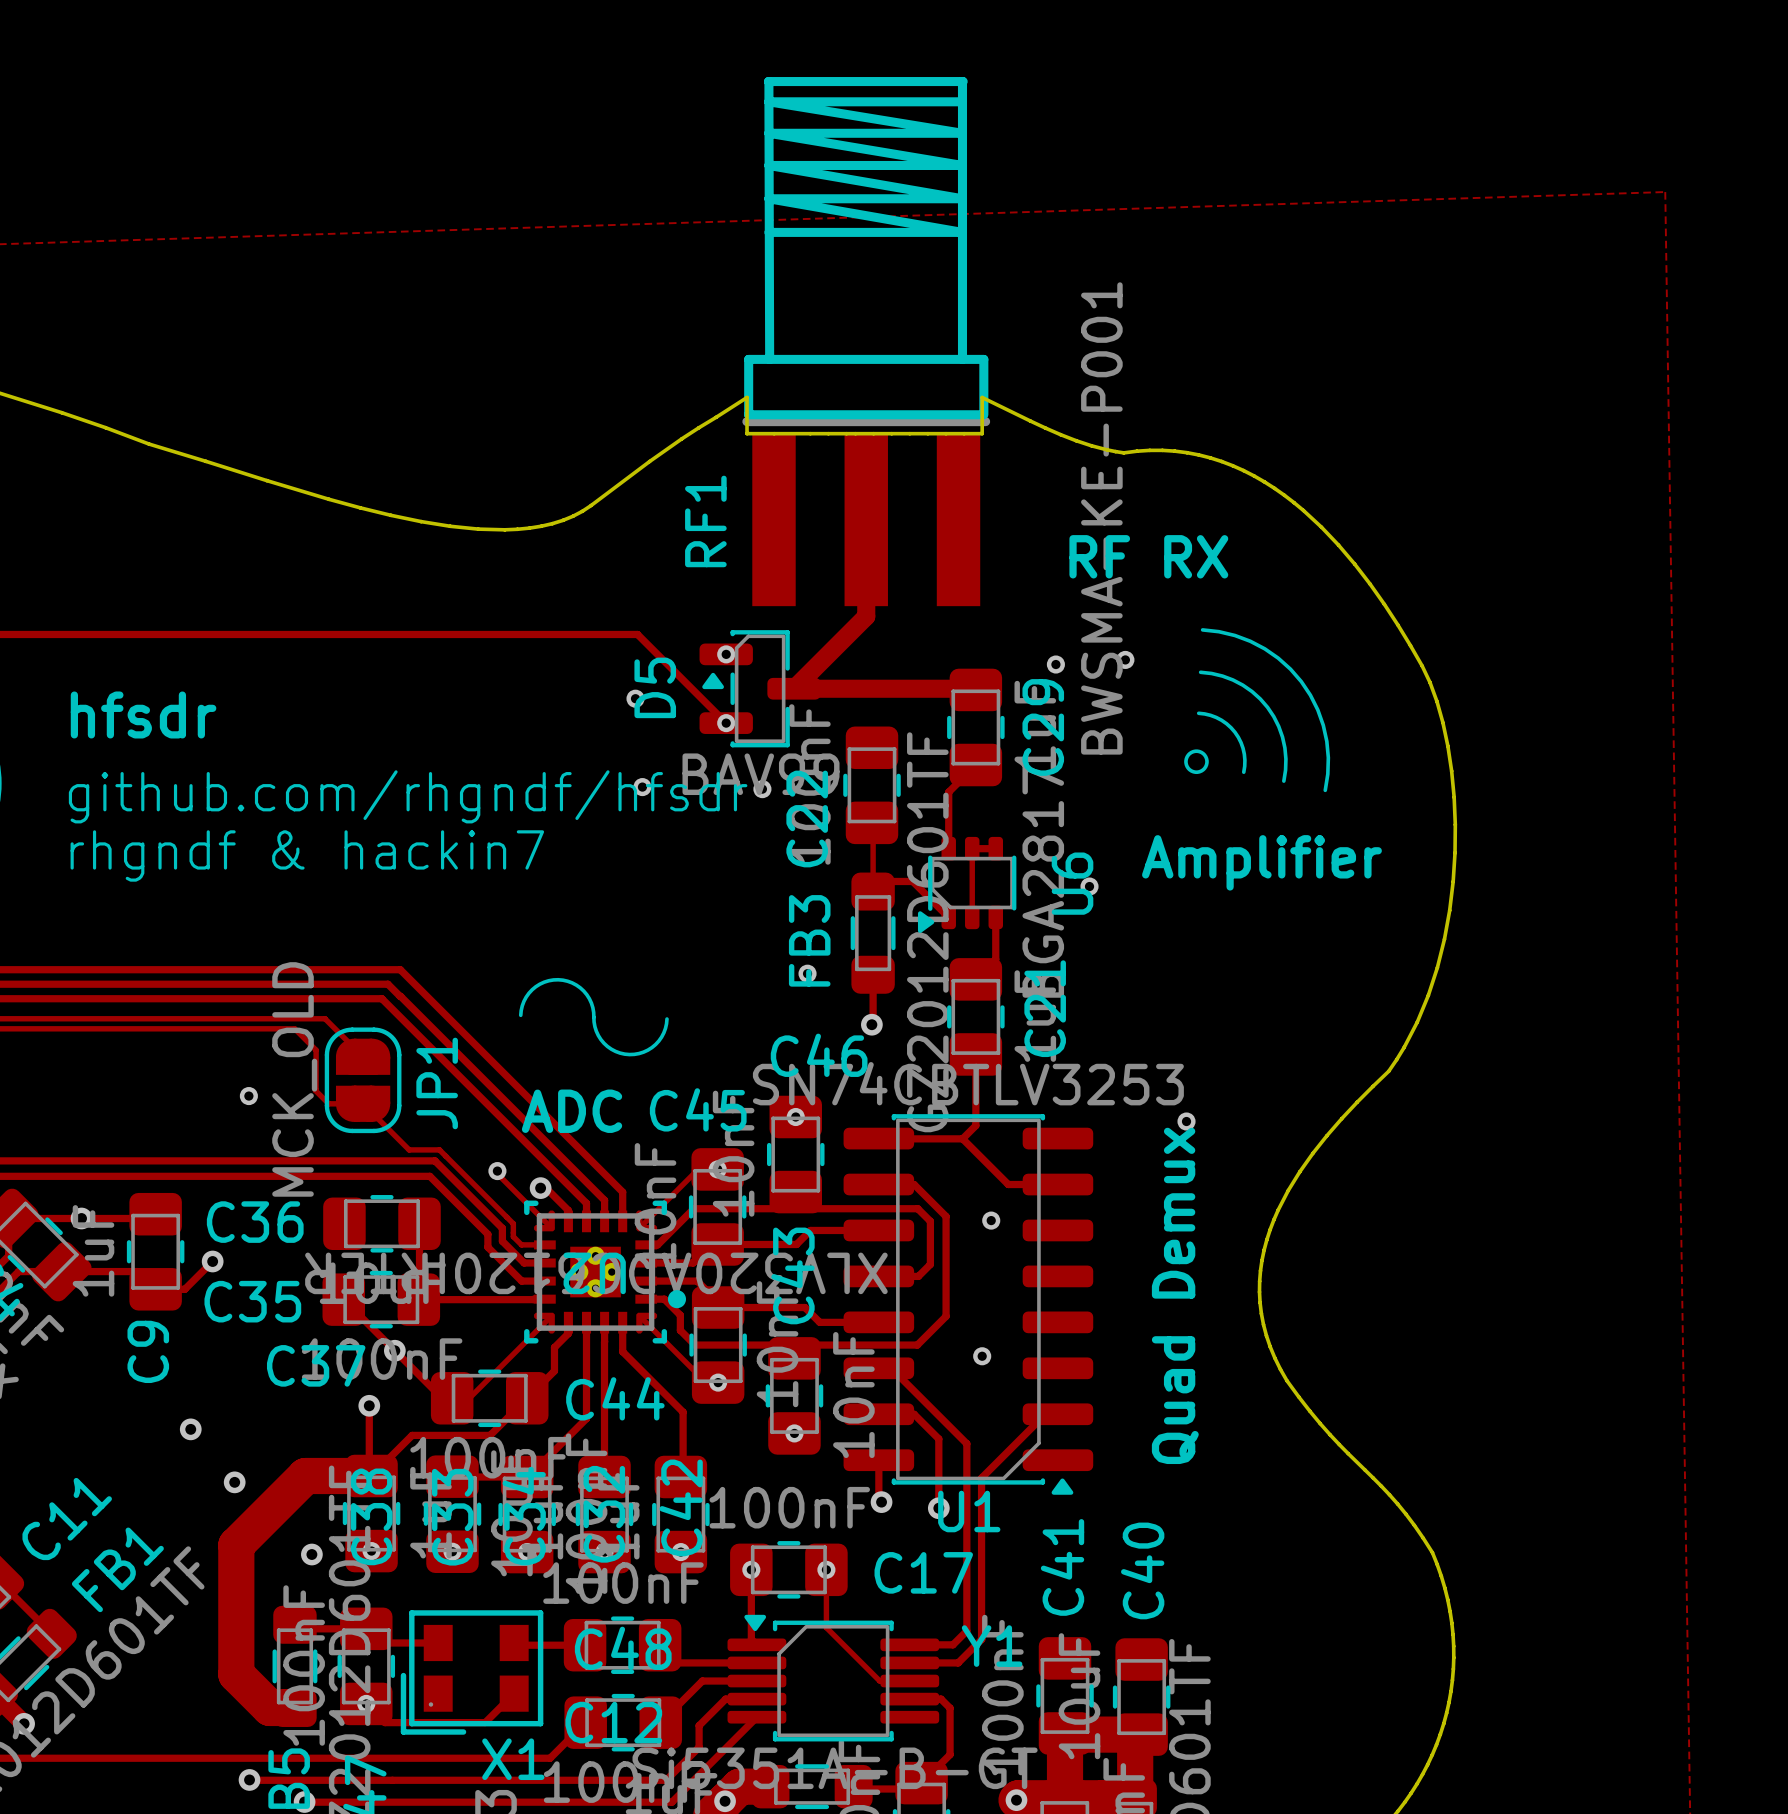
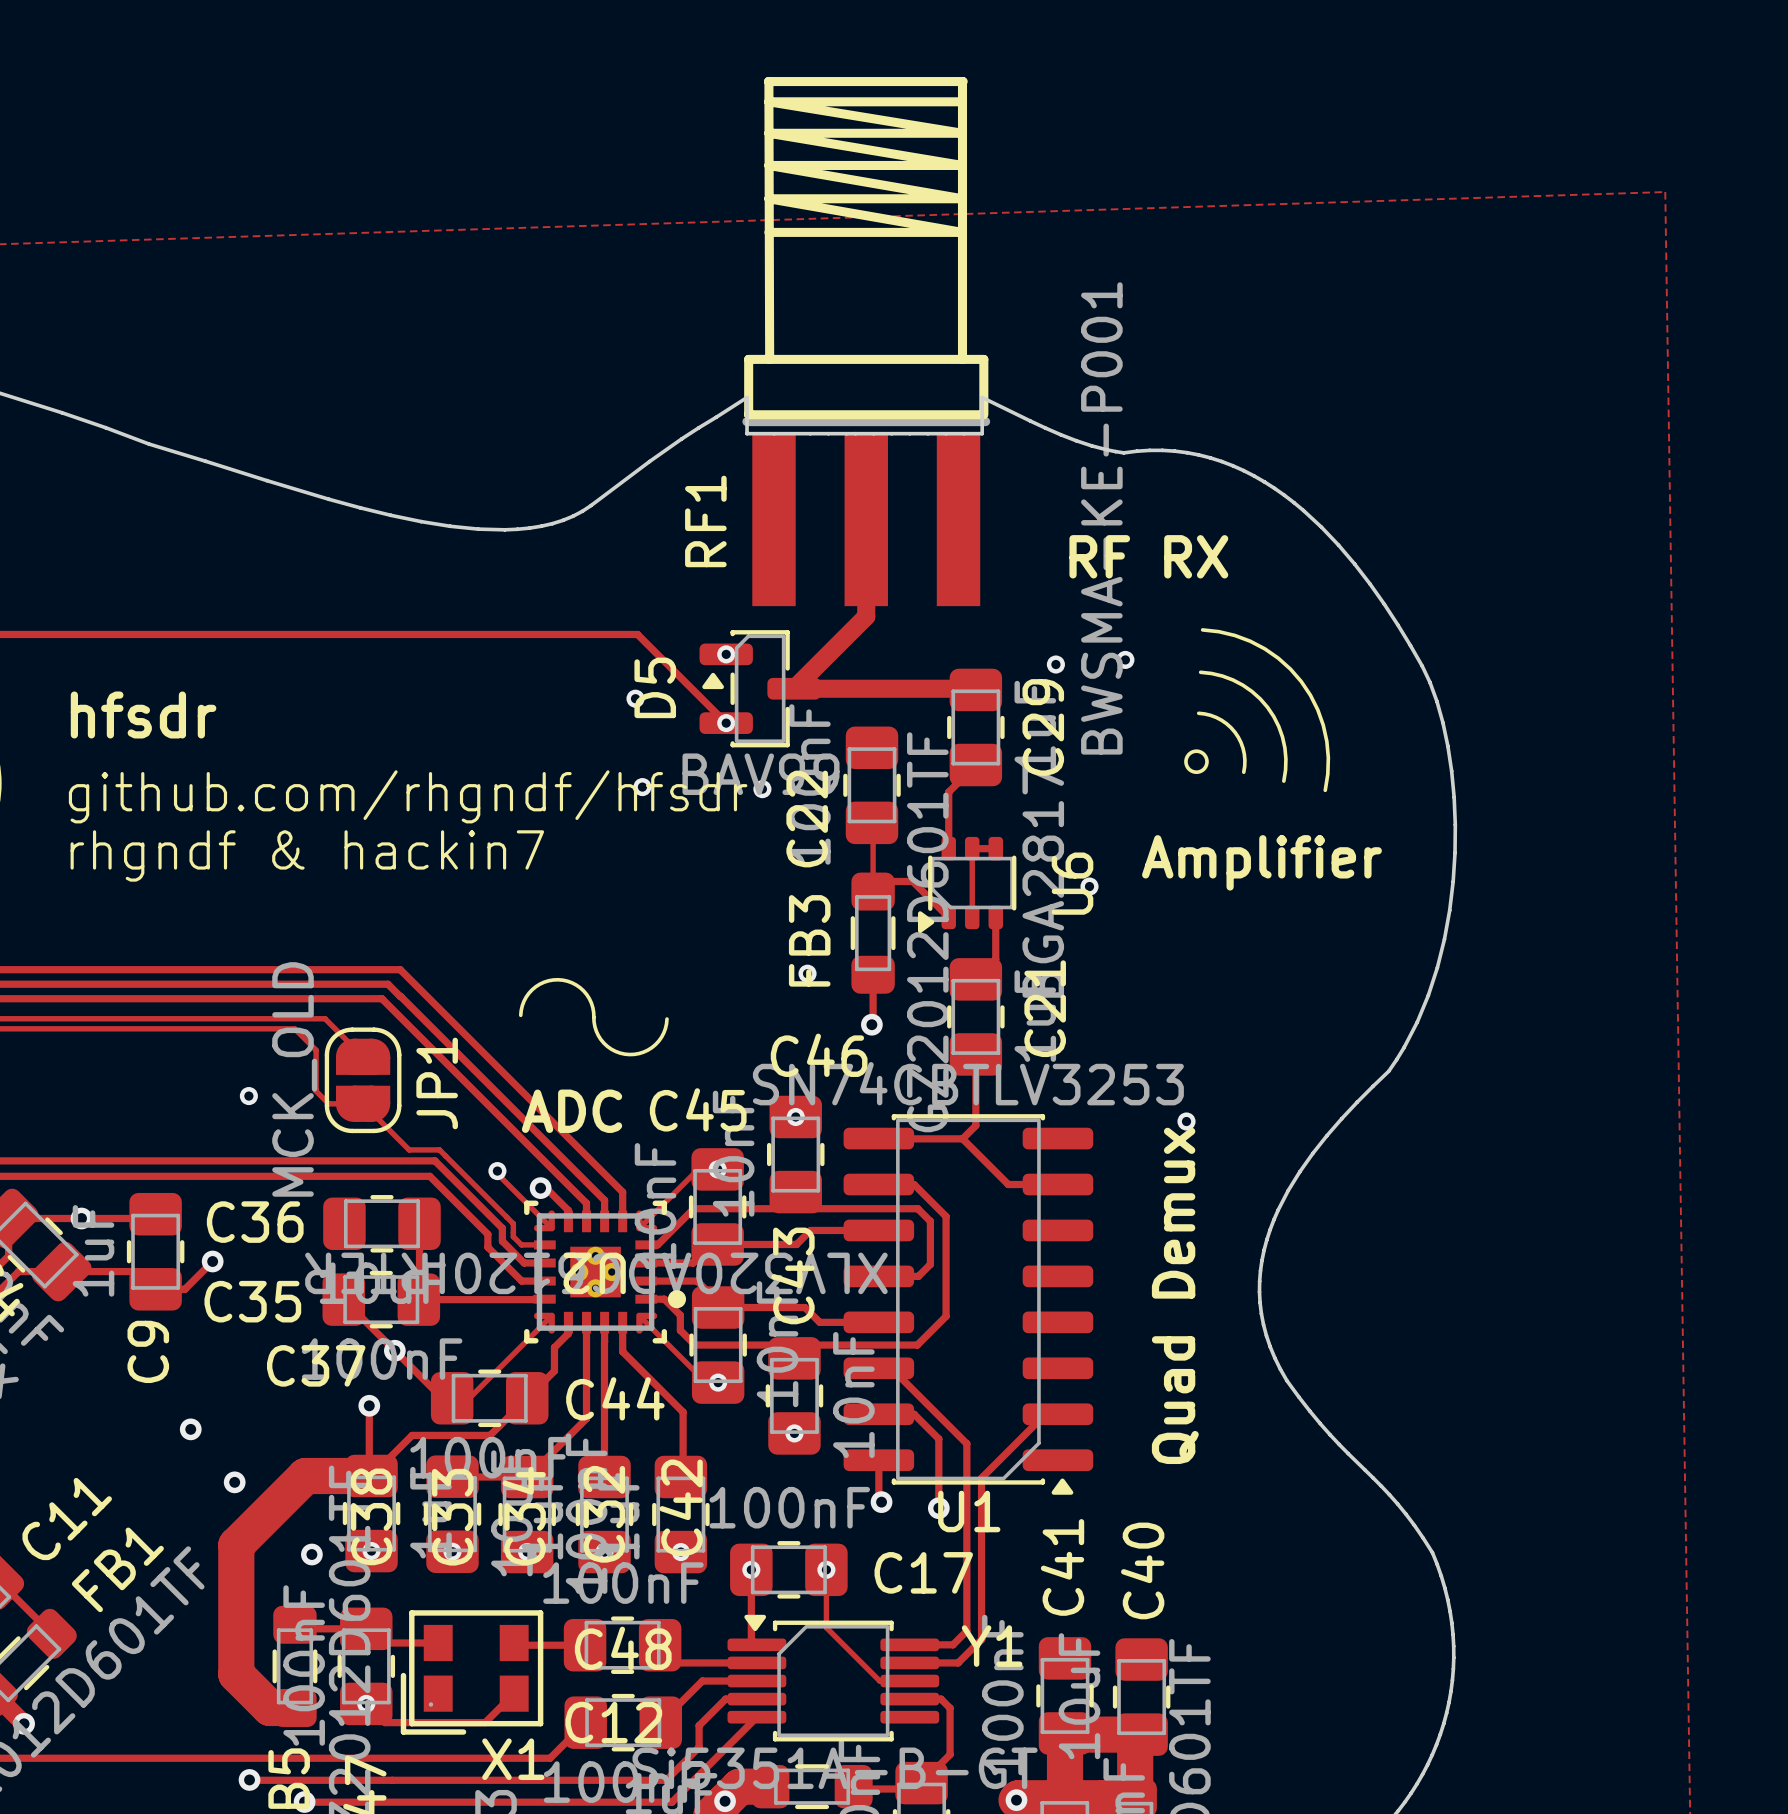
via: (991, 1220) -> none
via: (982, 1356) -> none

